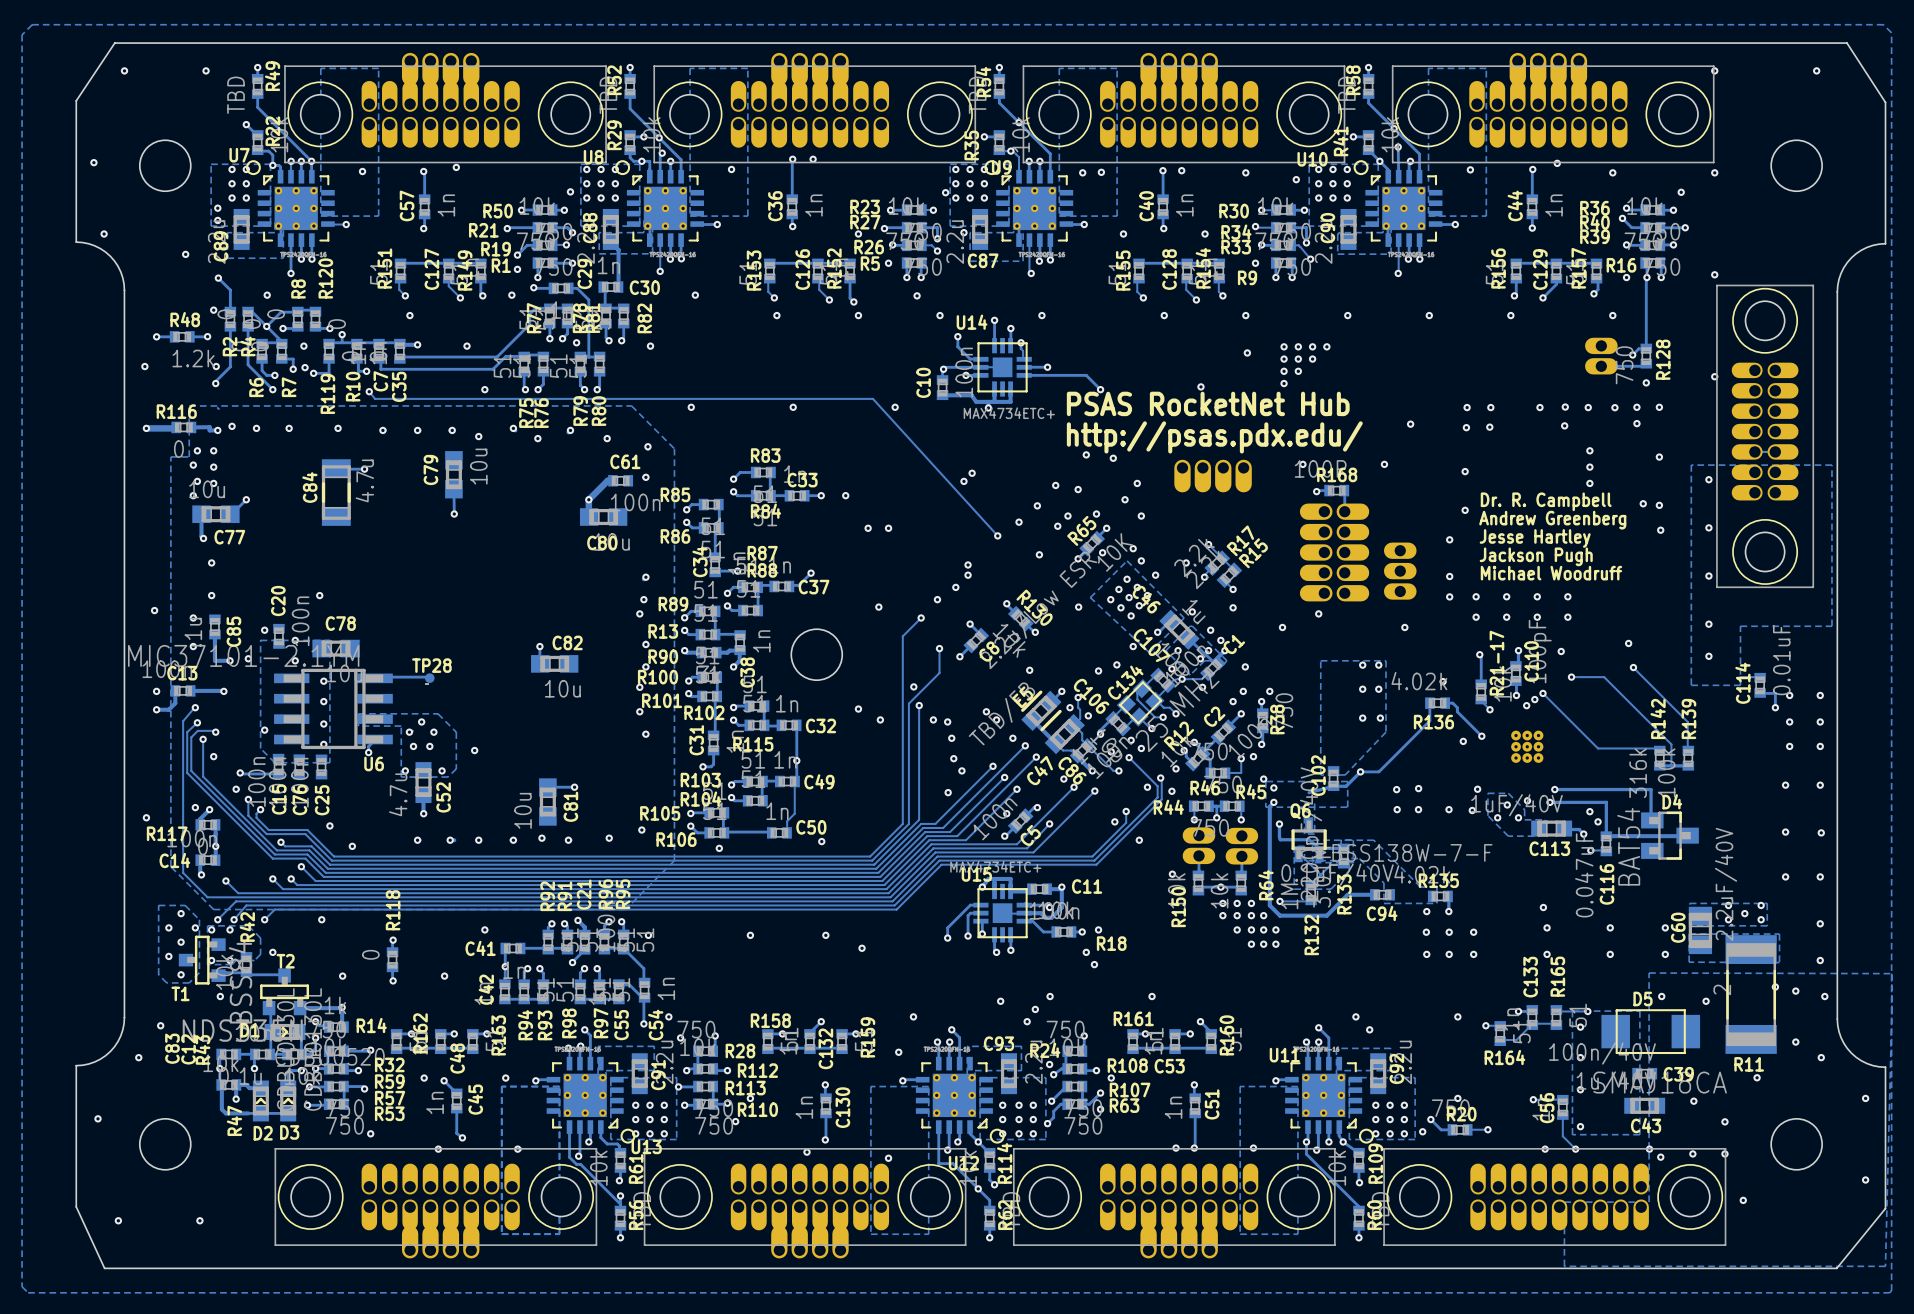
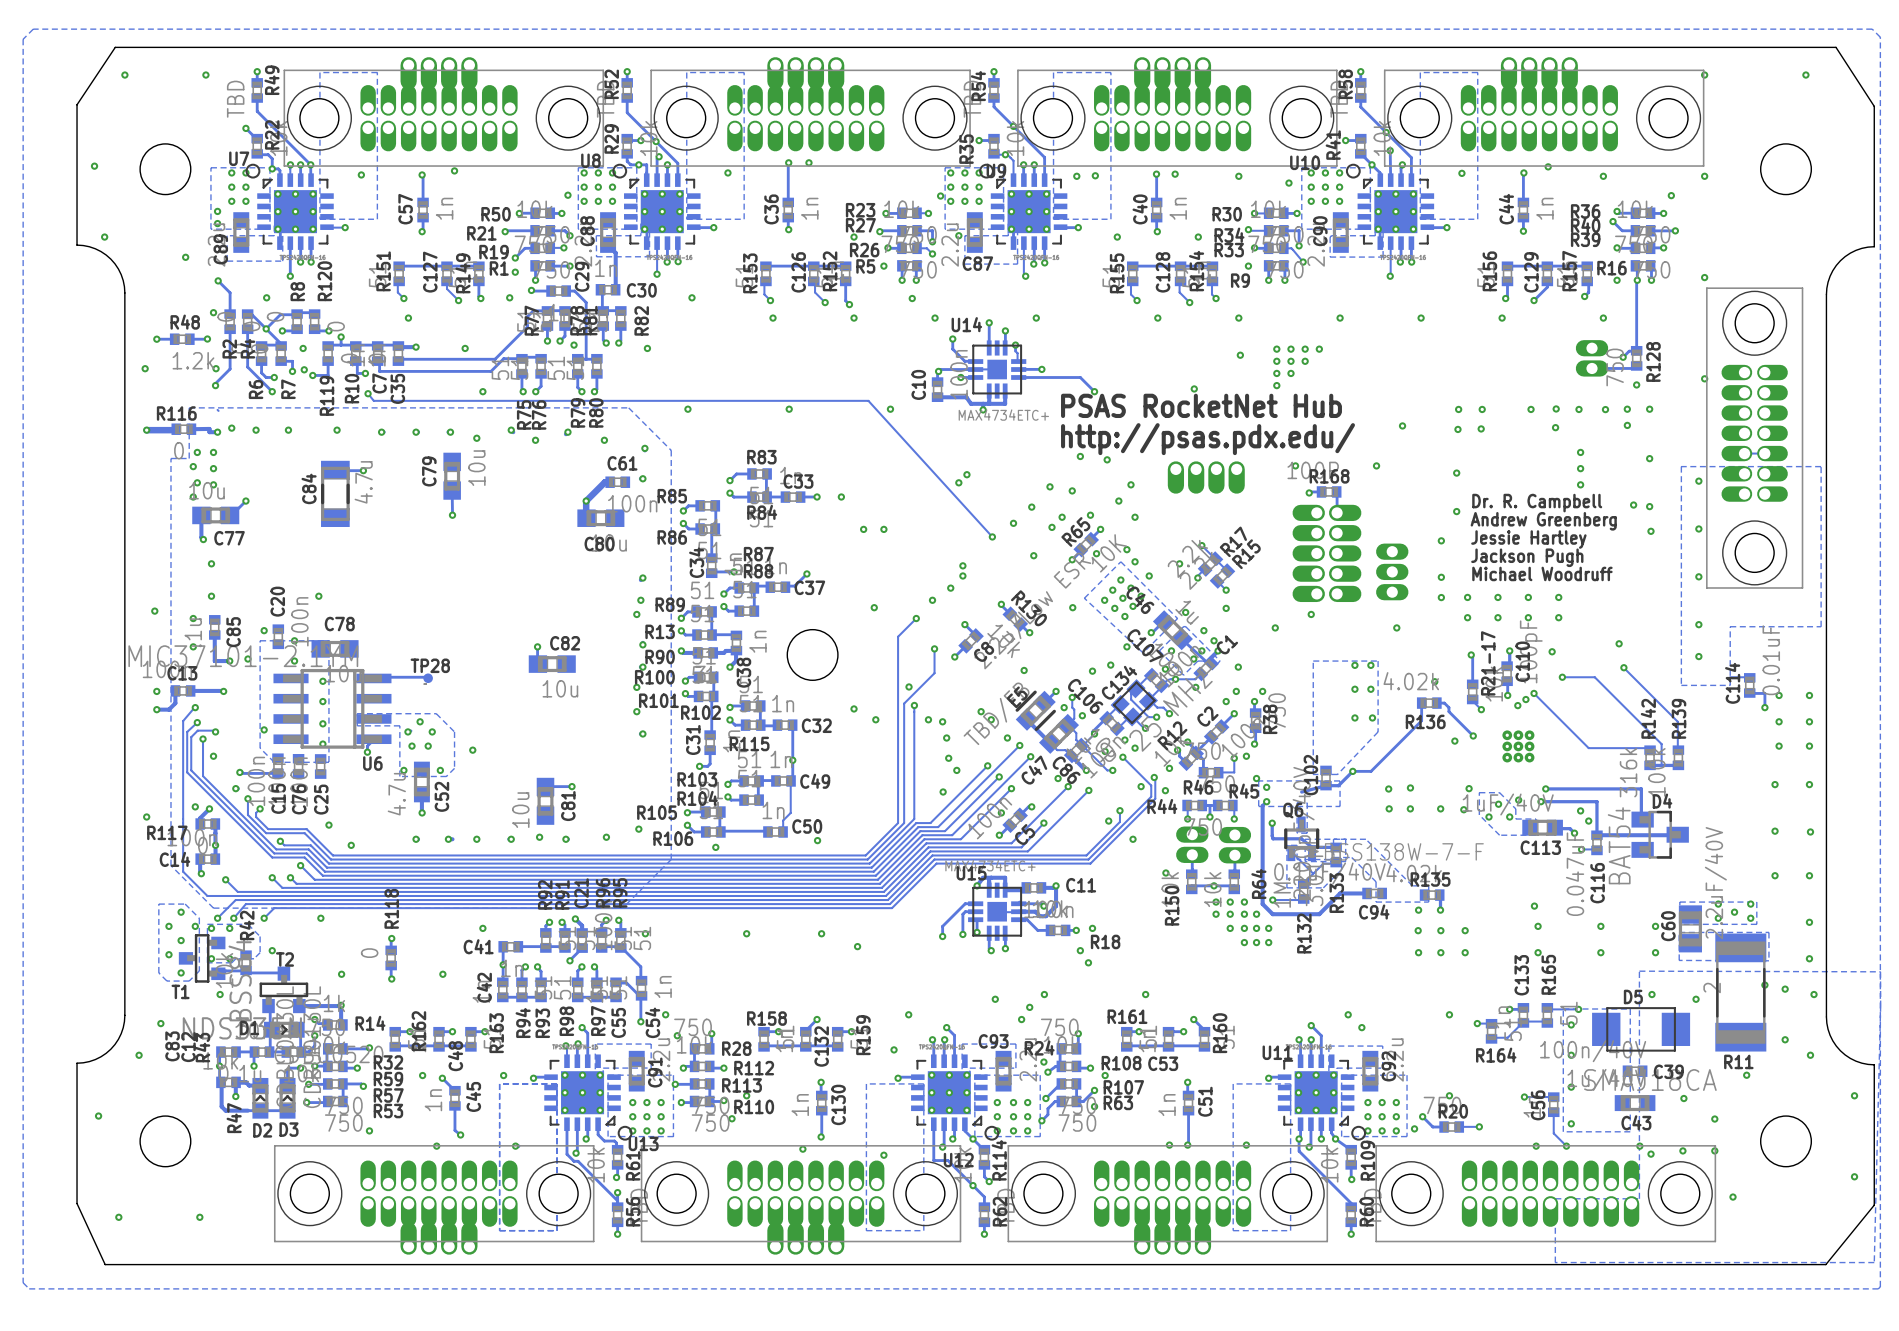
text: Jesse Hartley (1535, 538) -> Jessie Hartley (1528, 539)

